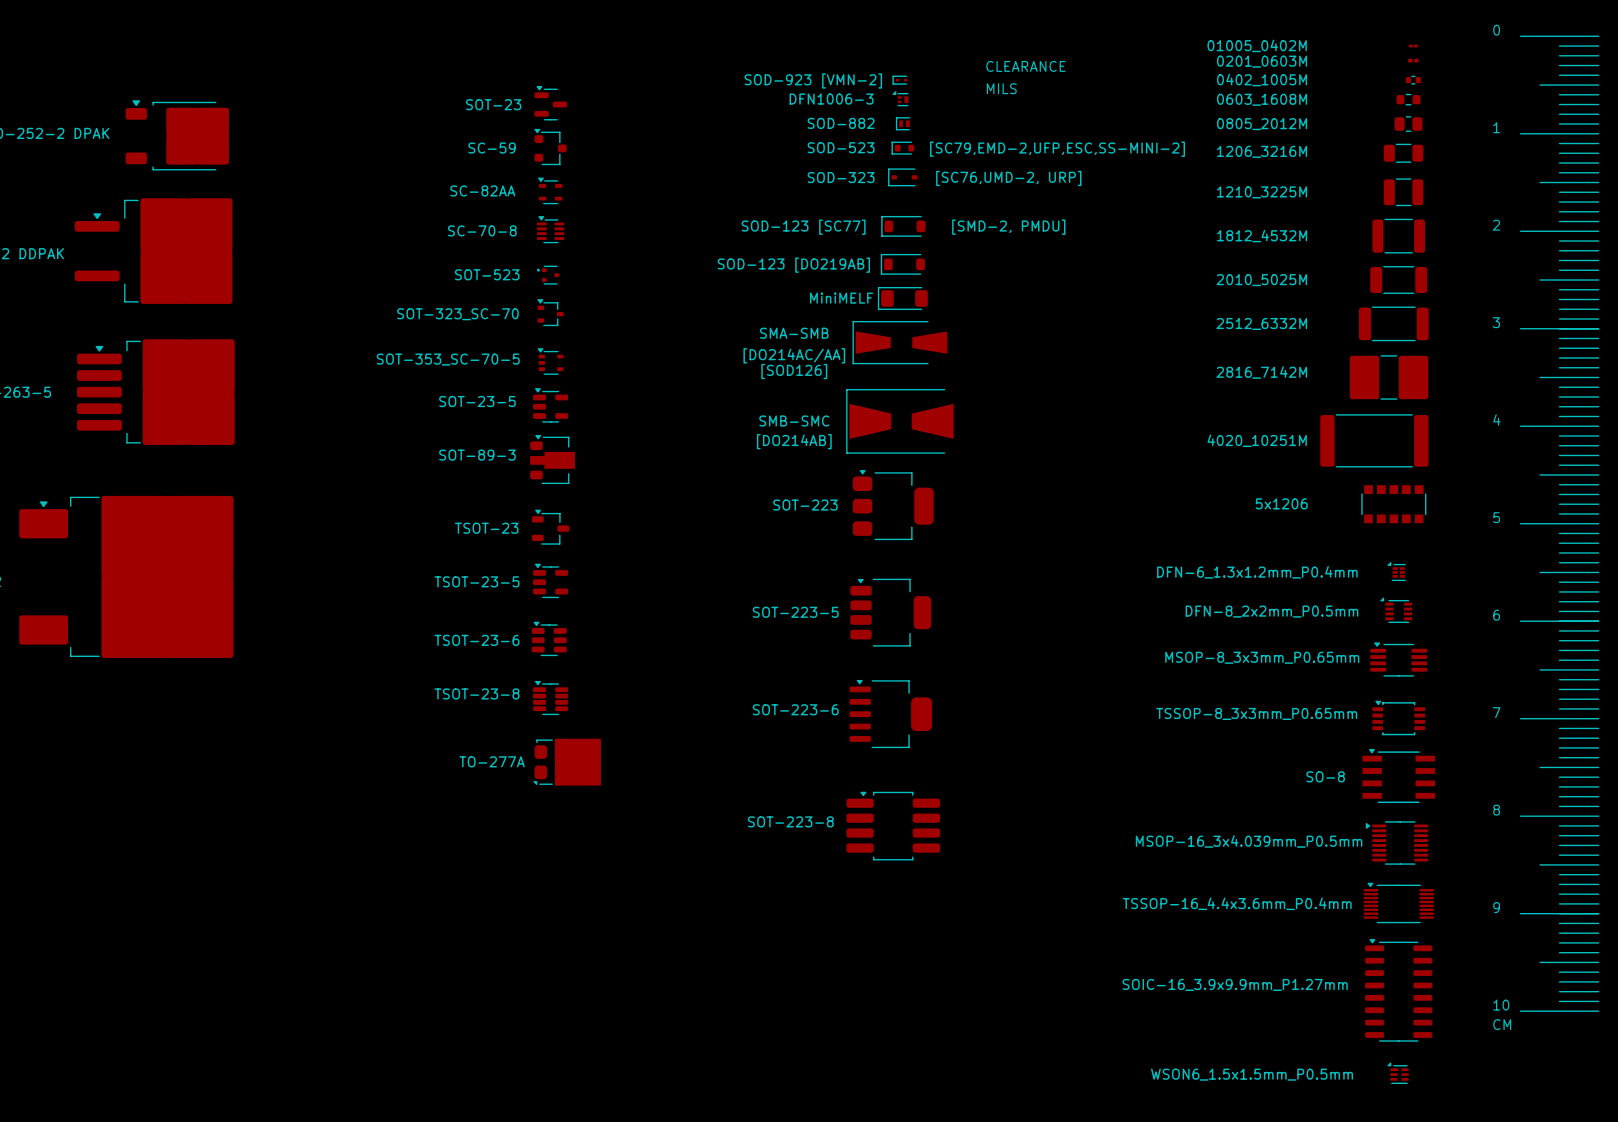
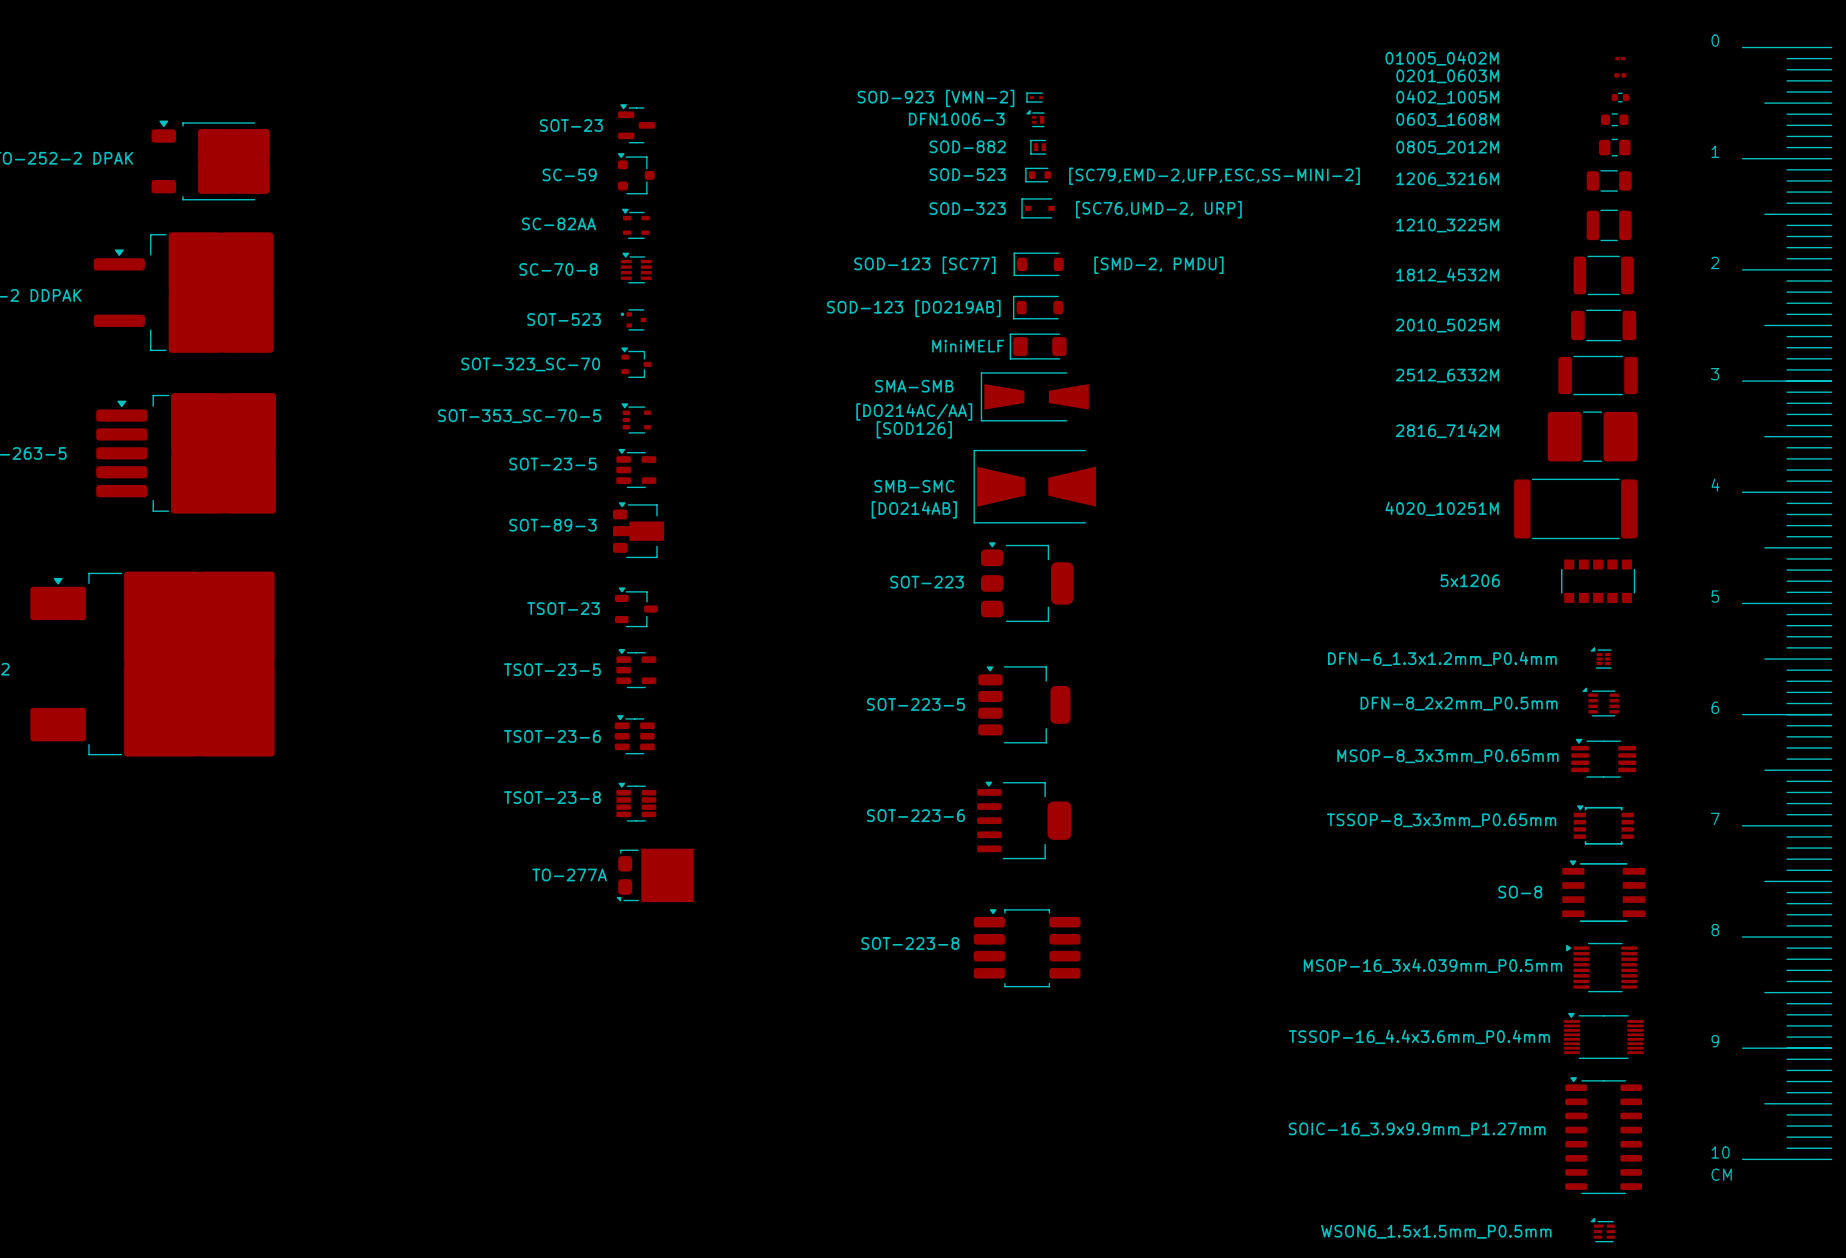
text: CLEARANCE (1025, 66) -> none
text: MILS (1001, 88) -> none

